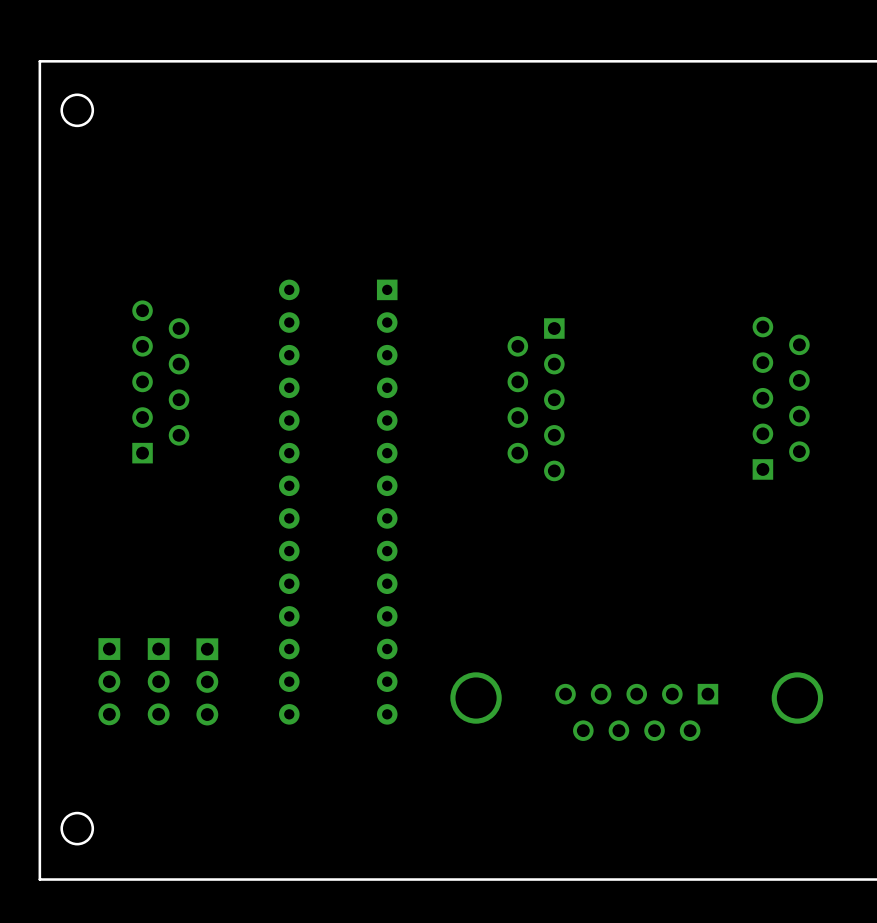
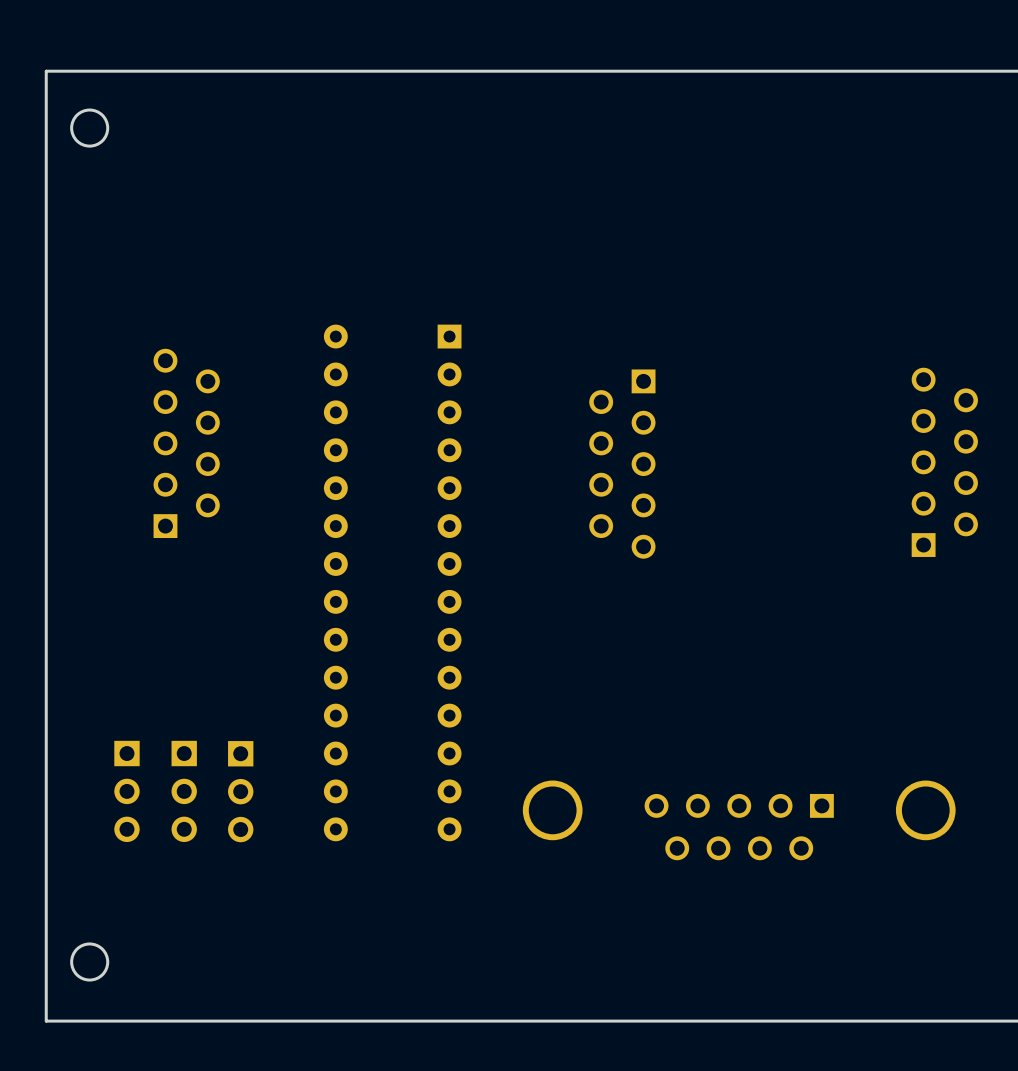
part position: (781, 398) -> (944, 462)

